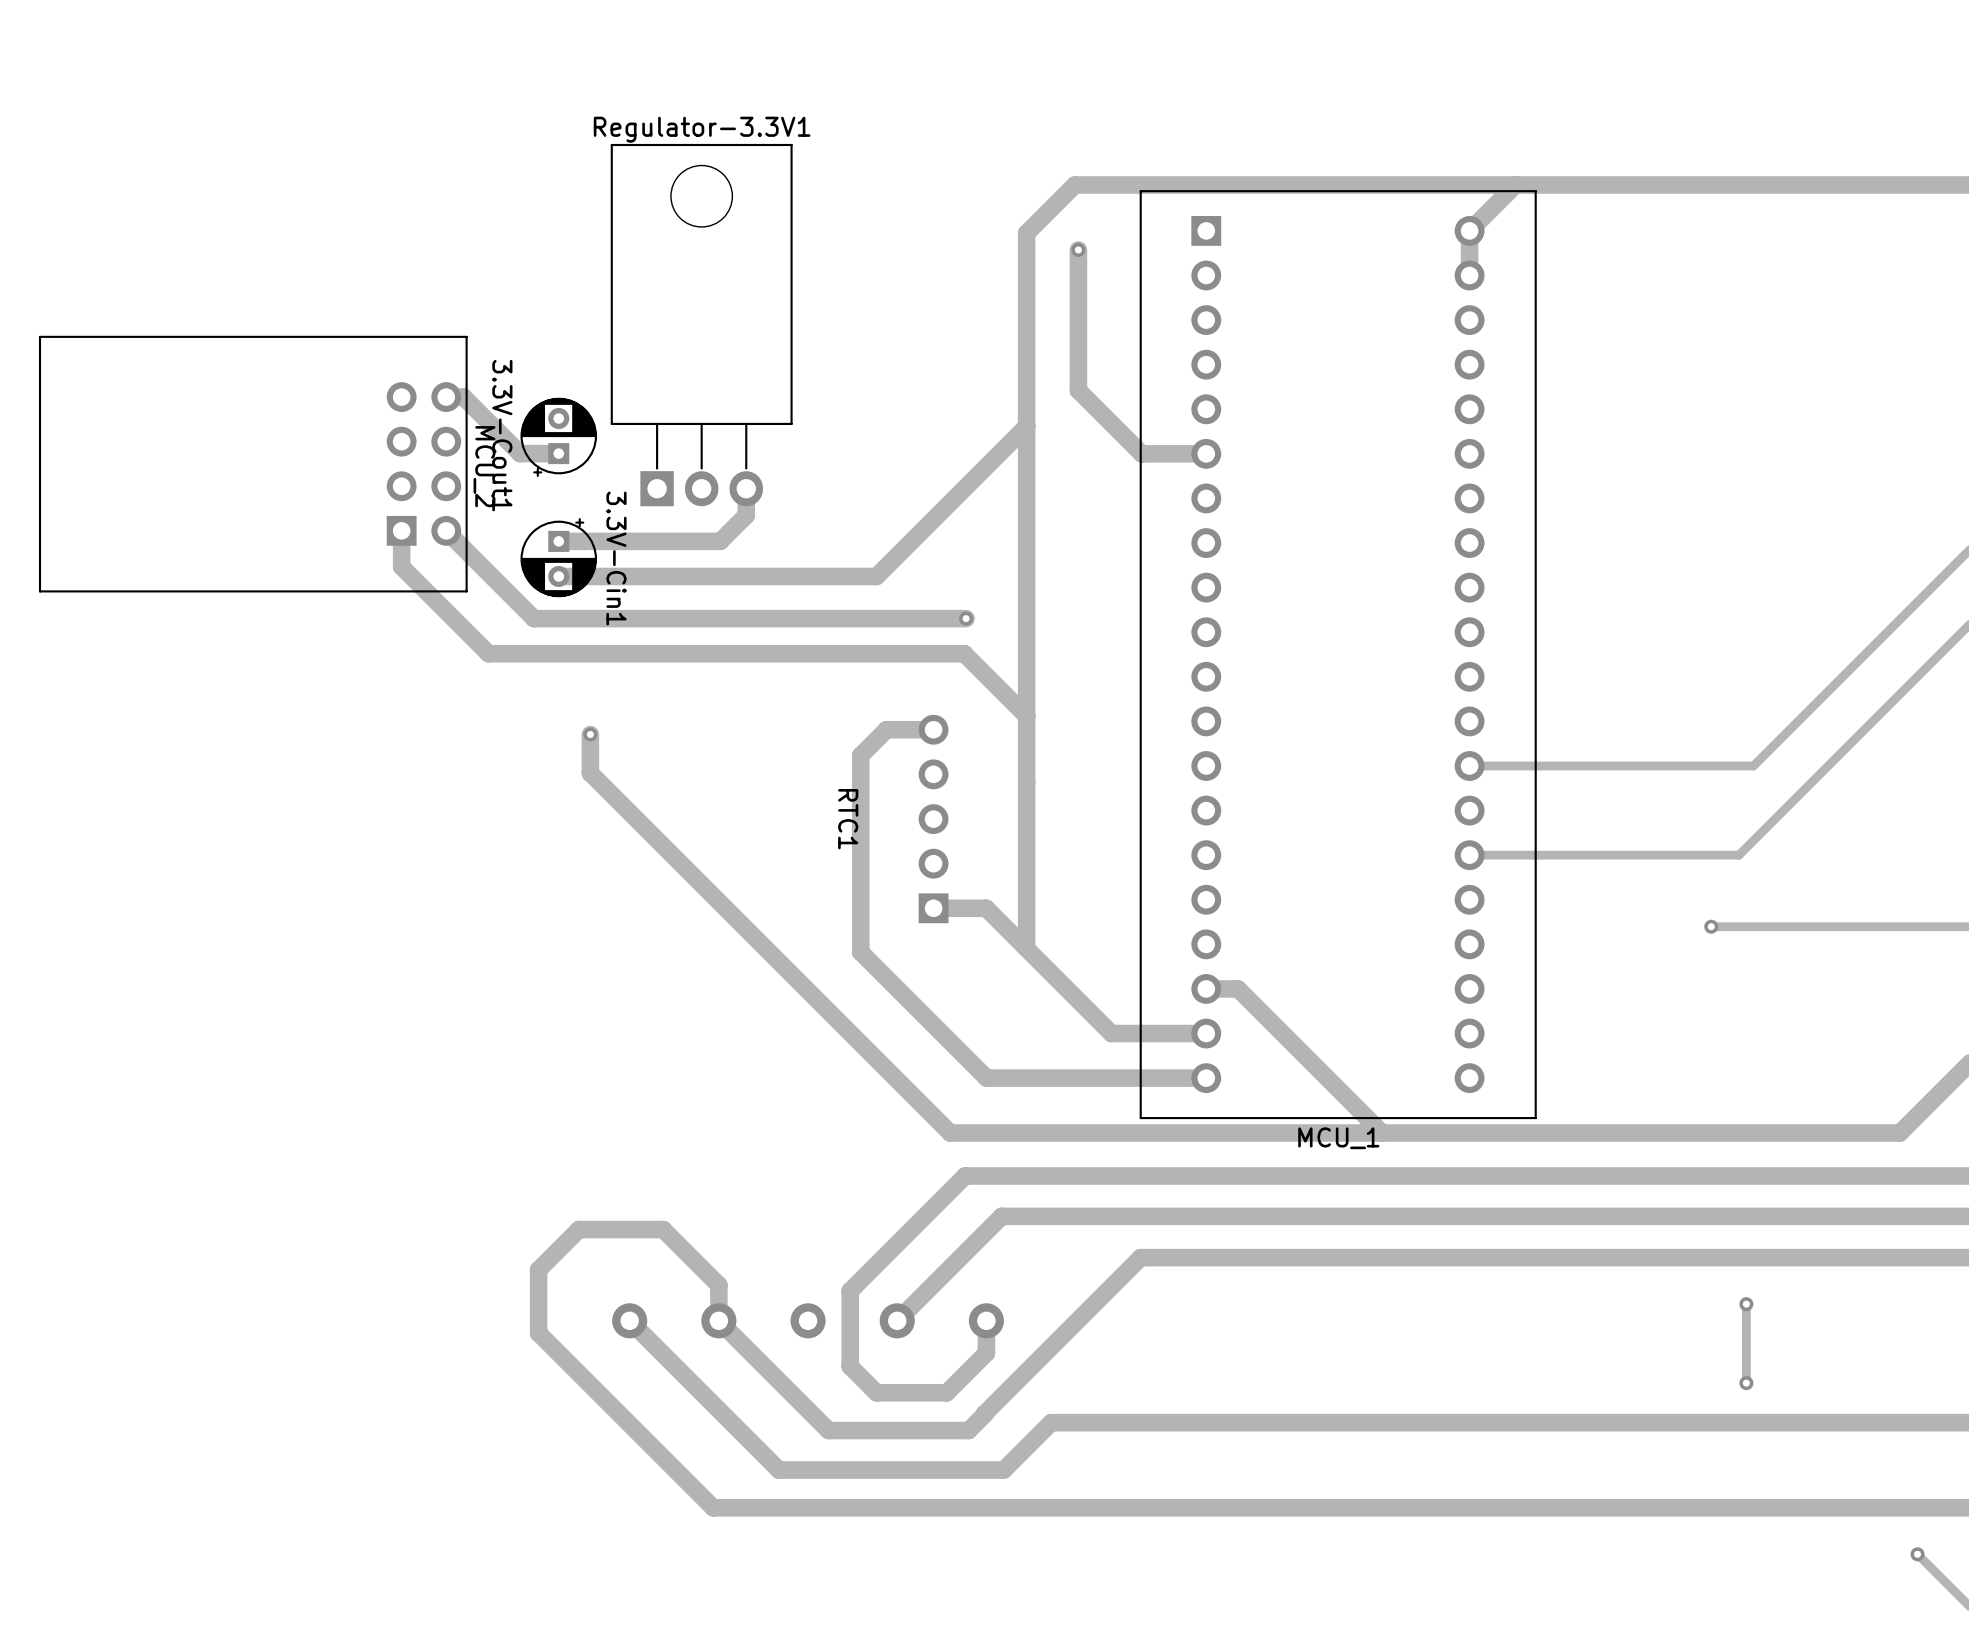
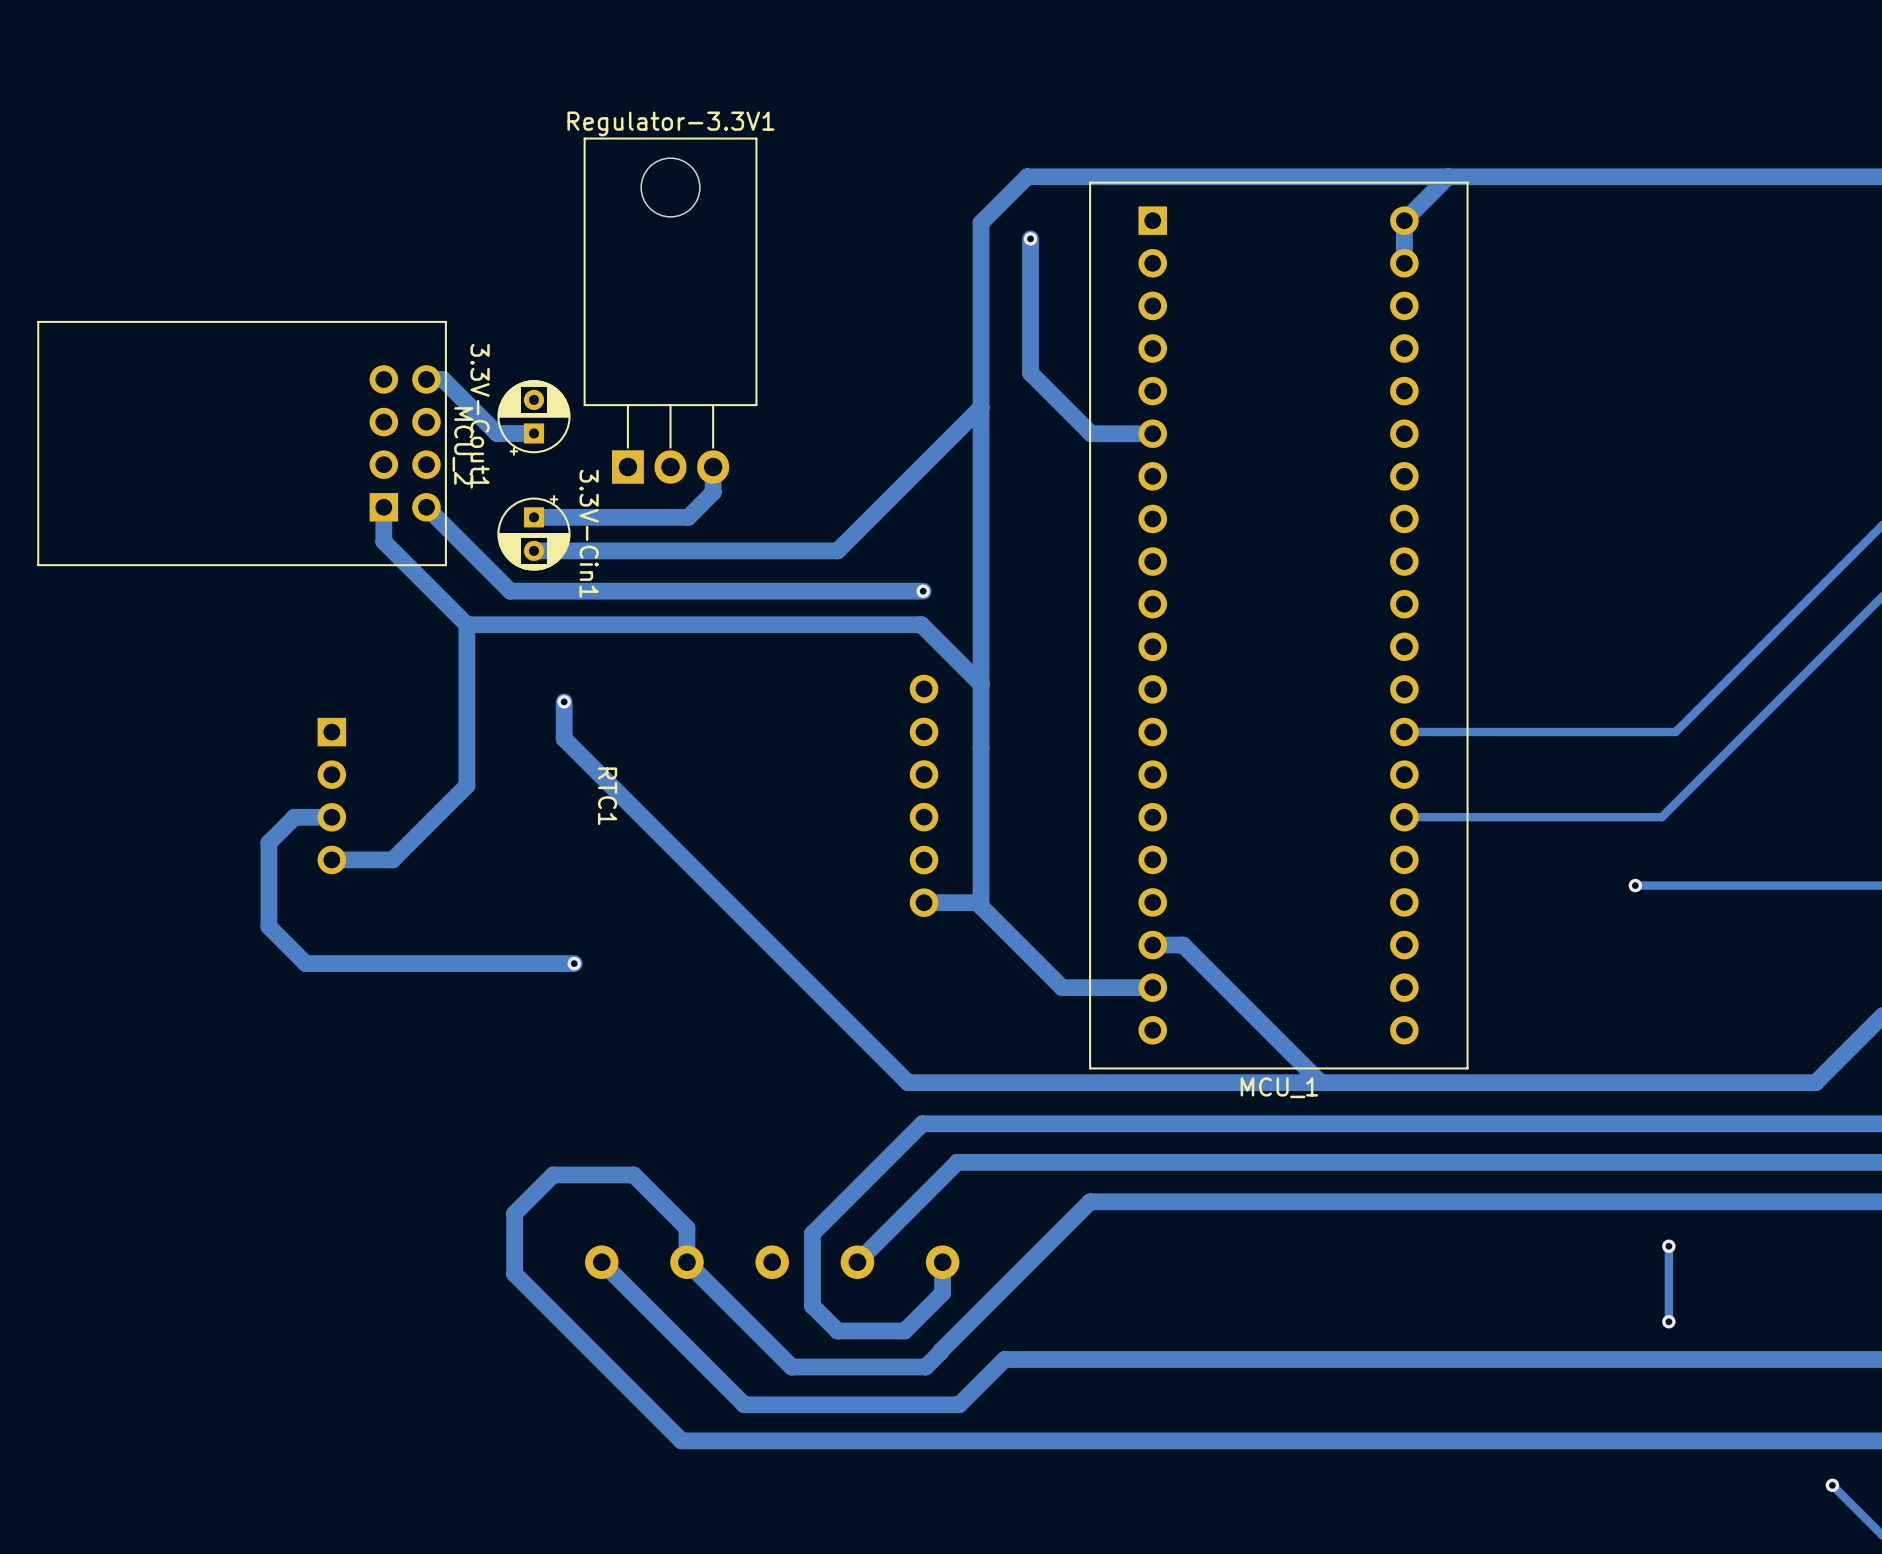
track: none -> (466, 624) (466, 785) (392, 859) (331, 859)
RTC1 footprint: [918, 714, 949, 924] -> [317, 674, 939, 917]
track: (933, 729) (886, 729) (860, 755) (860, 952) (986, 1078) (1206, 1078) -> none
RTC1 name position: RTC1 (848, 819) -> RTC1 (607, 796)
track: none -> (331, 817) (294, 817) (268, 842) (268, 926) (305, 963) (574, 963)
track: (933, 908) (986, 908) (1022, 944) -> (924, 902) (977, 902)
via: none -> (574, 963)

